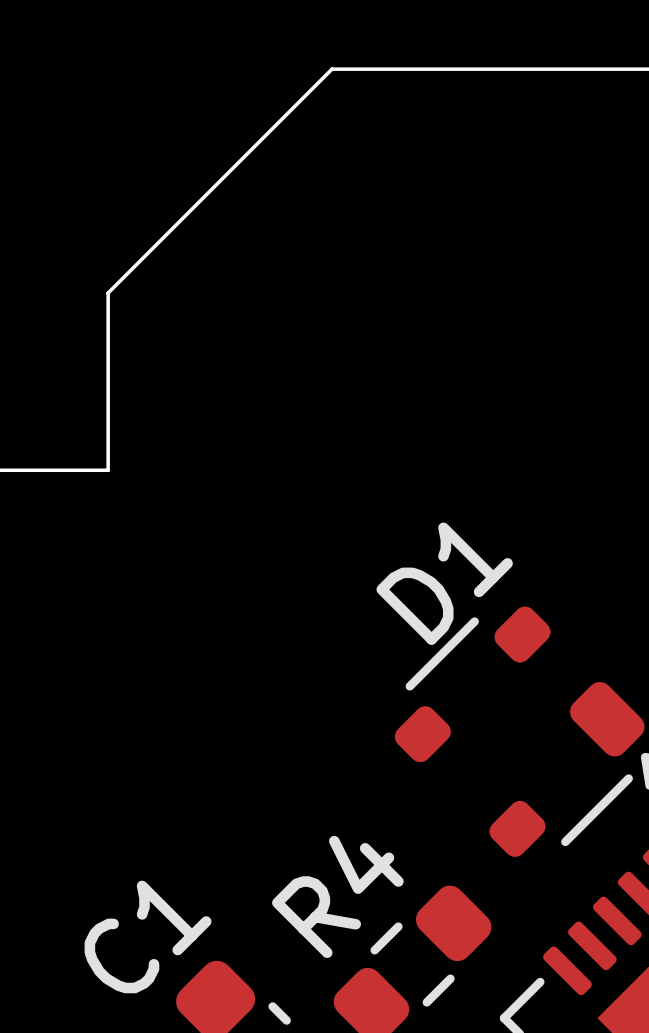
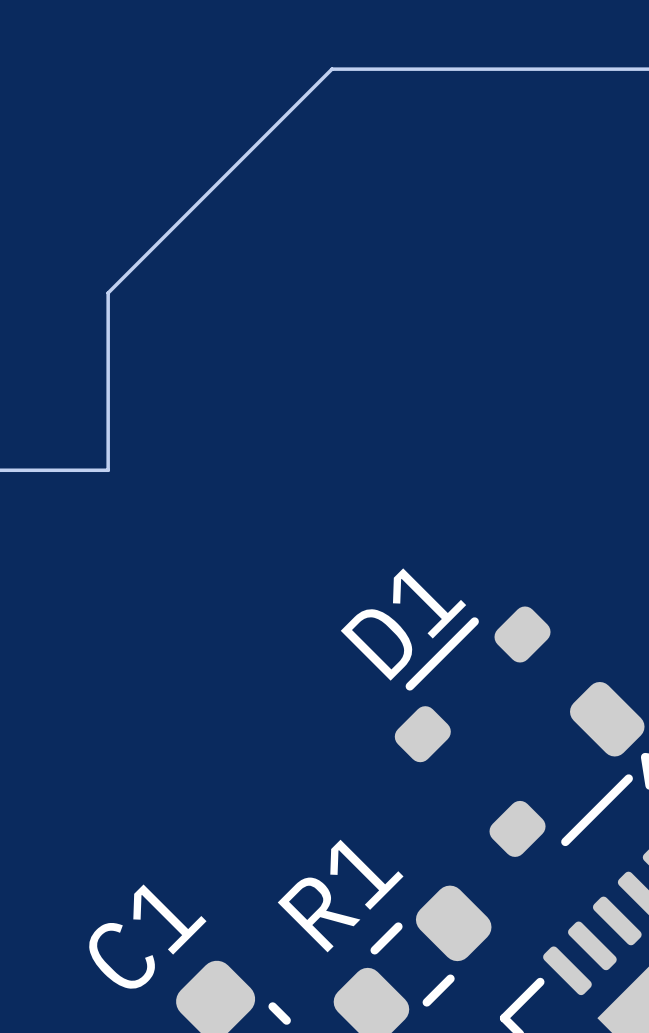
D1 name position: D1 (444, 583) -> D1 (403, 624)
R4 name: R4 (337, 896) -> R1 (340, 896)

